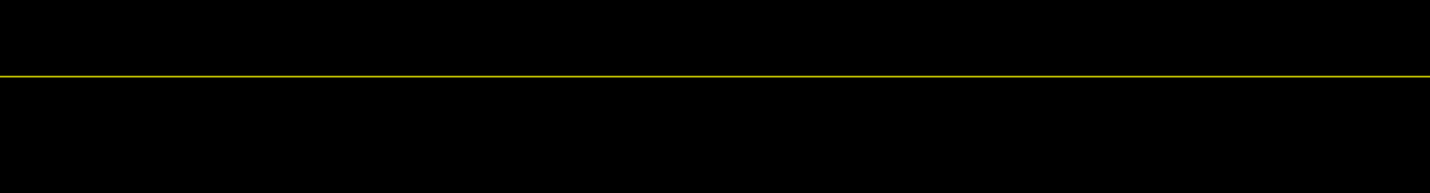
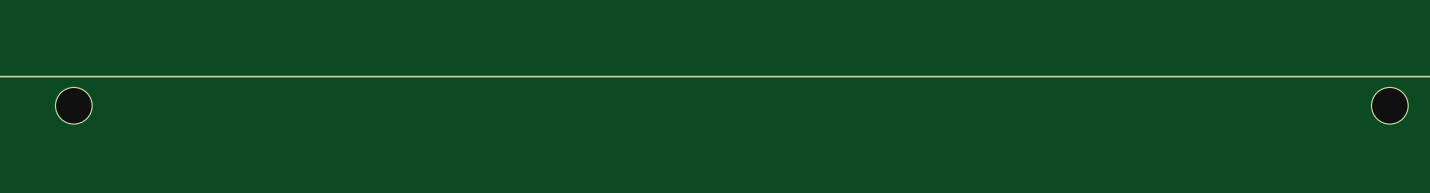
part: none -> (73, 105)
part: none -> (1389, 105)

